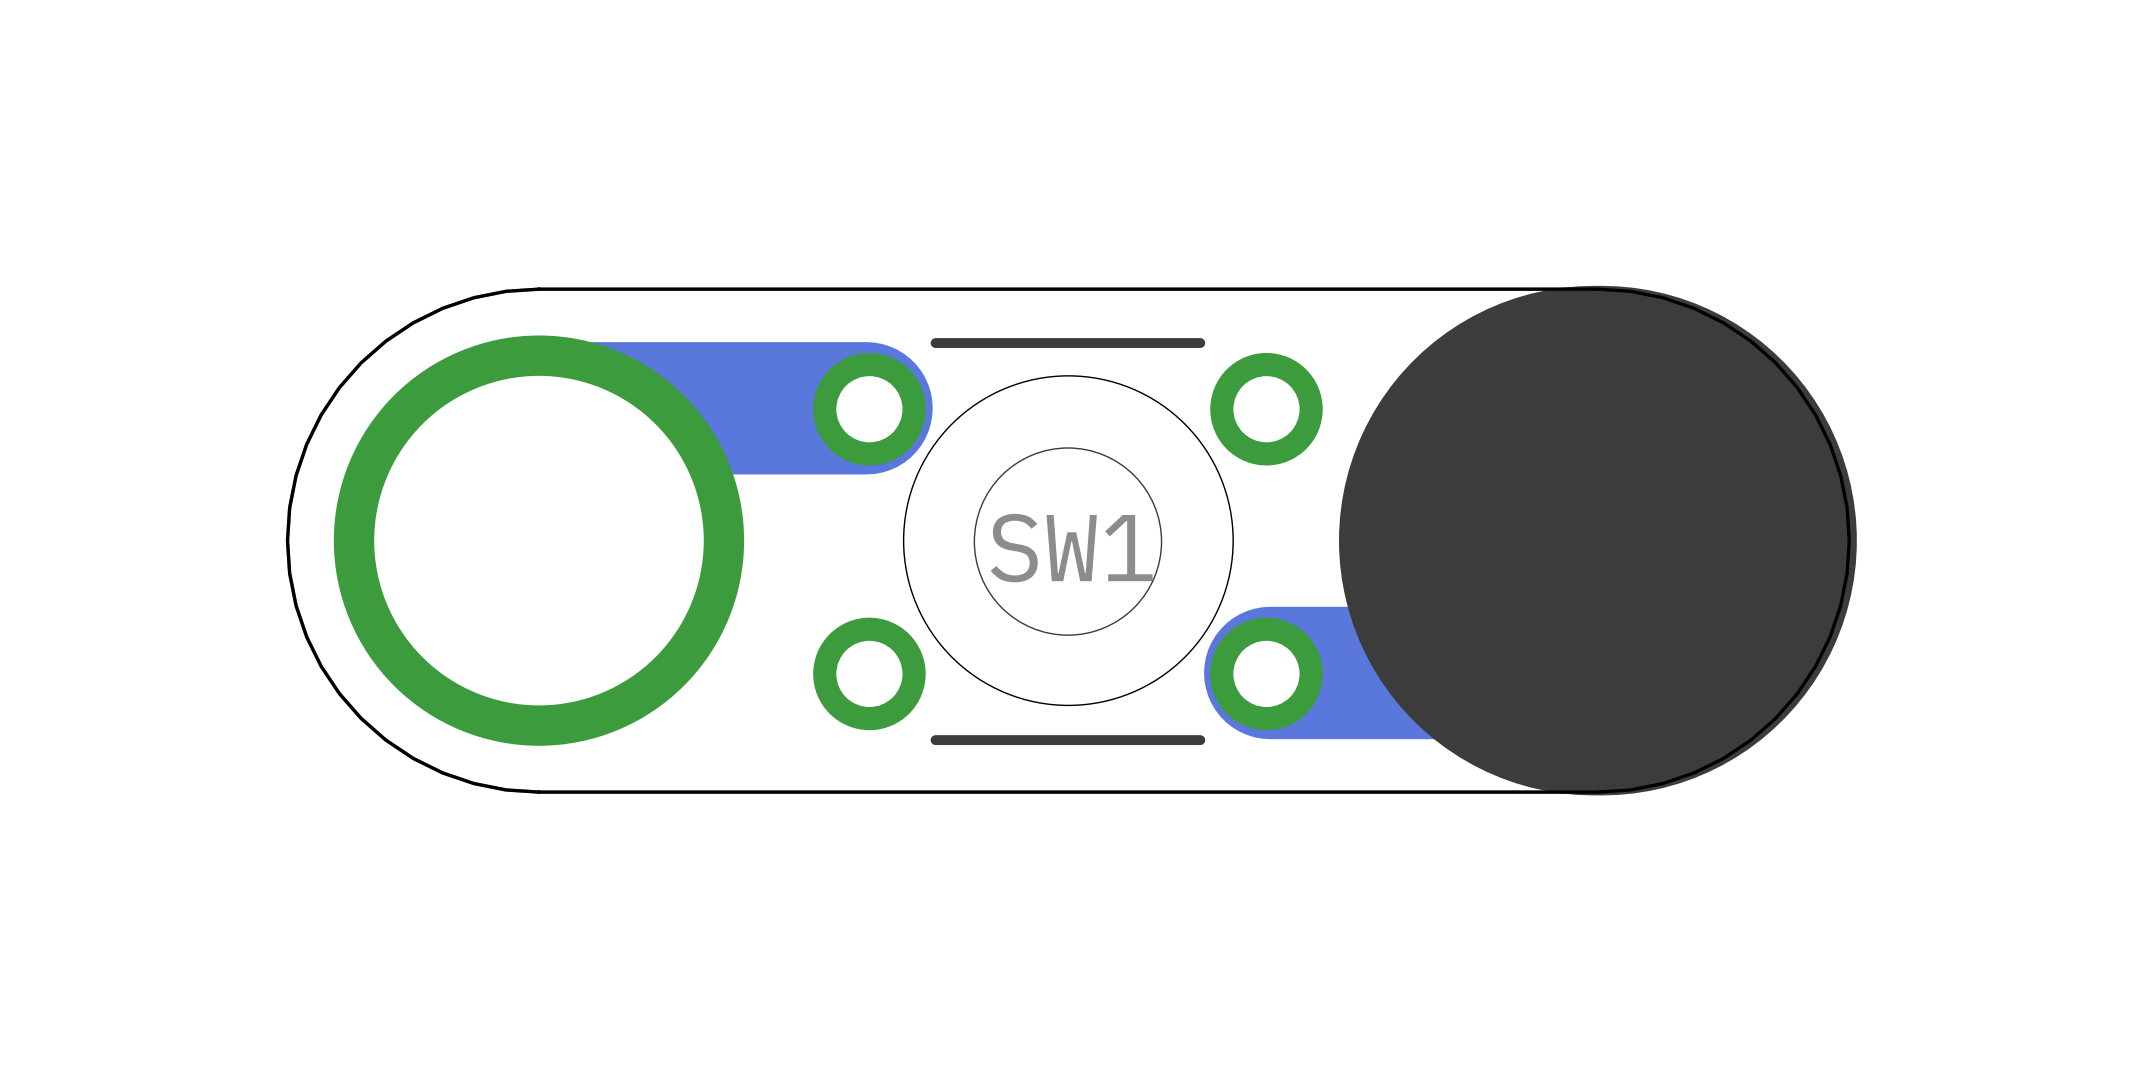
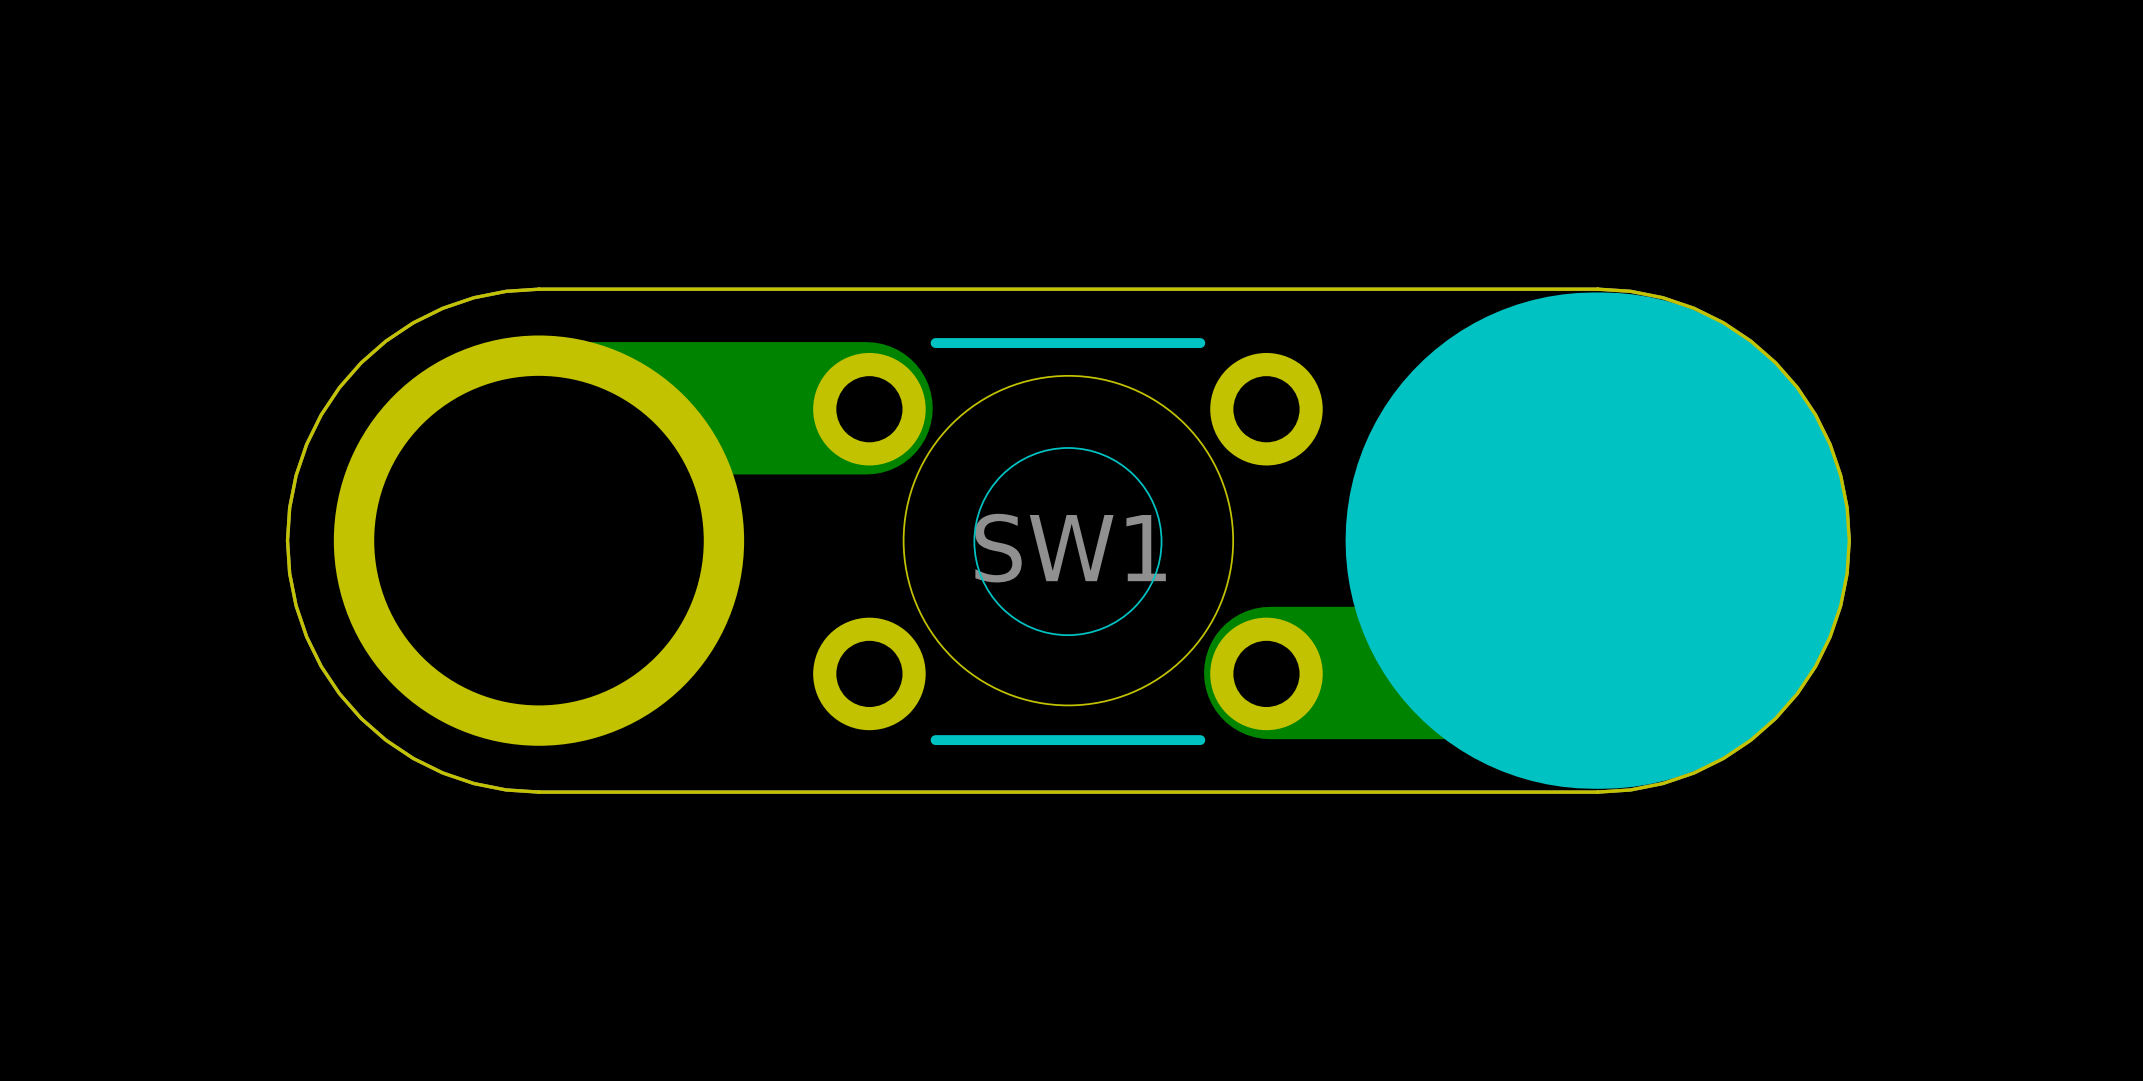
SW1 footprint: [285, 285, 1857, 796] -> [285, 287, 1851, 794]

